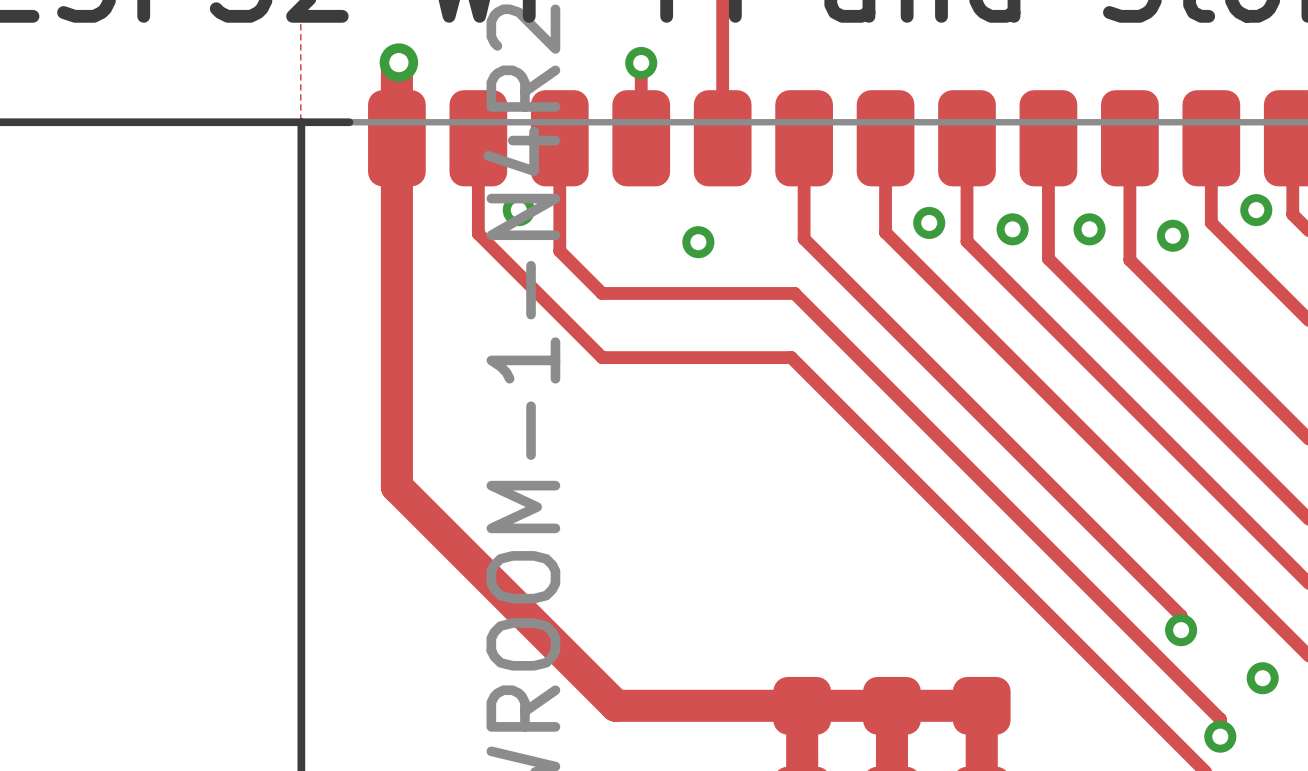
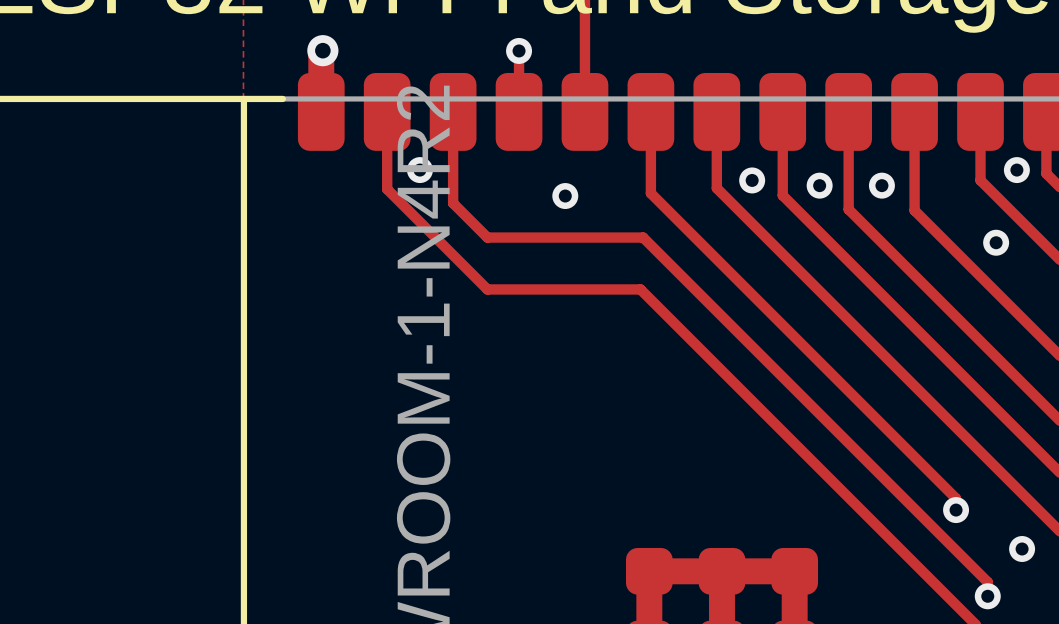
track: (396, 138) (396, 486) (615, 705) (802, 705) -> none
via position: (1172, 235) -> (996, 242)

